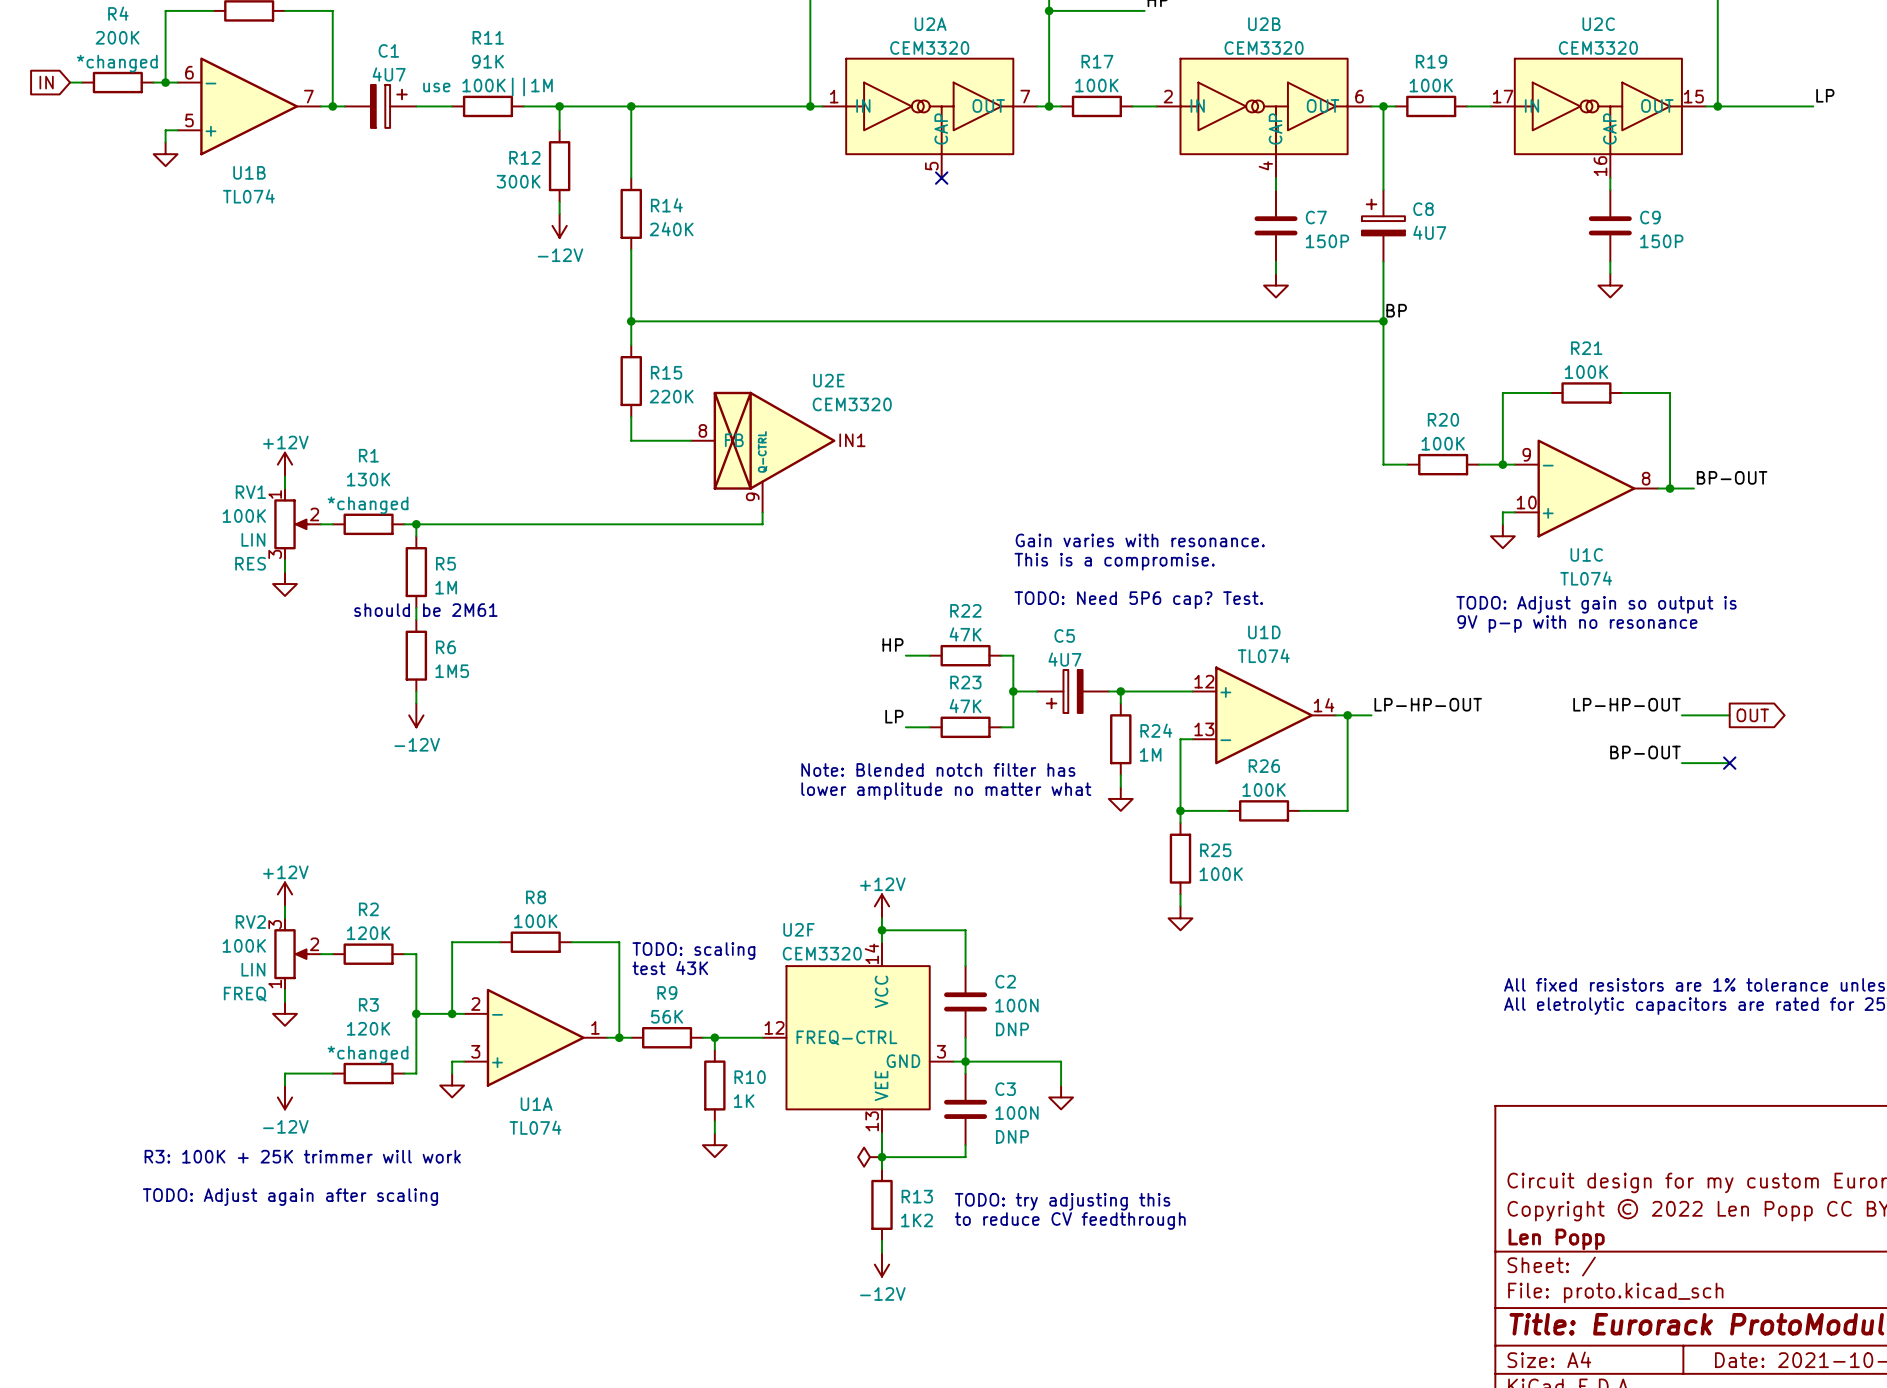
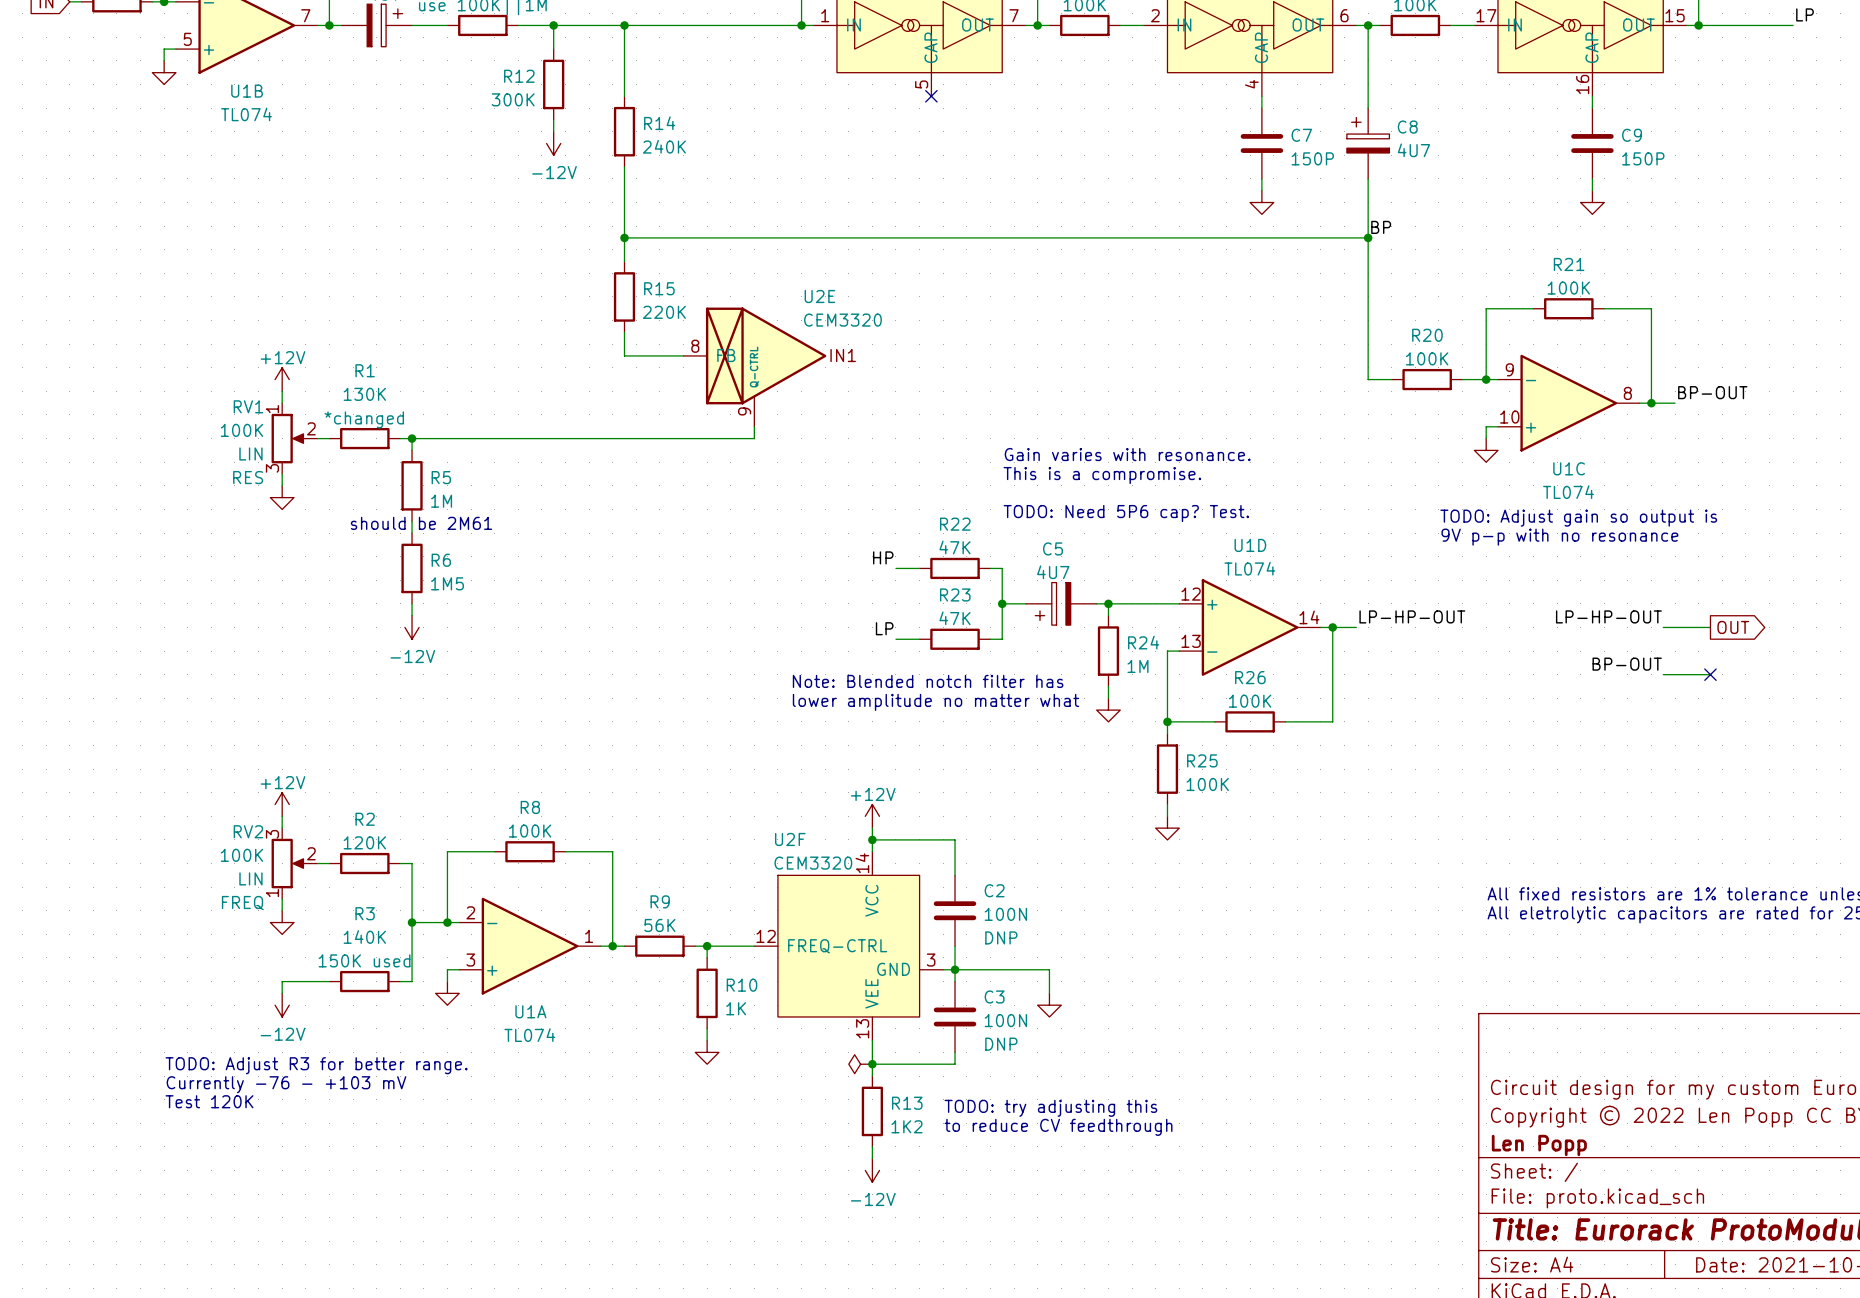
text: TODO: scaling (693, 951) -> none
text: test 43K (670, 967) -> none
R3 value: 120K (368, 1028) -> 140K (364, 937)
R3 text: *changed (368, 1054) -> 150K used (364, 960)
text: R3: 100K + 25K trimmer will work (302, 1156) -> none
text: none -> TODO: Adjust R3 for better range. (316, 1065)
text: none -> Currently -76 - +103 mV (286, 1084)
text: none -> Test 120K (209, 1101)
text: TODO: Adjust again after scaling (290, 1197) -> none

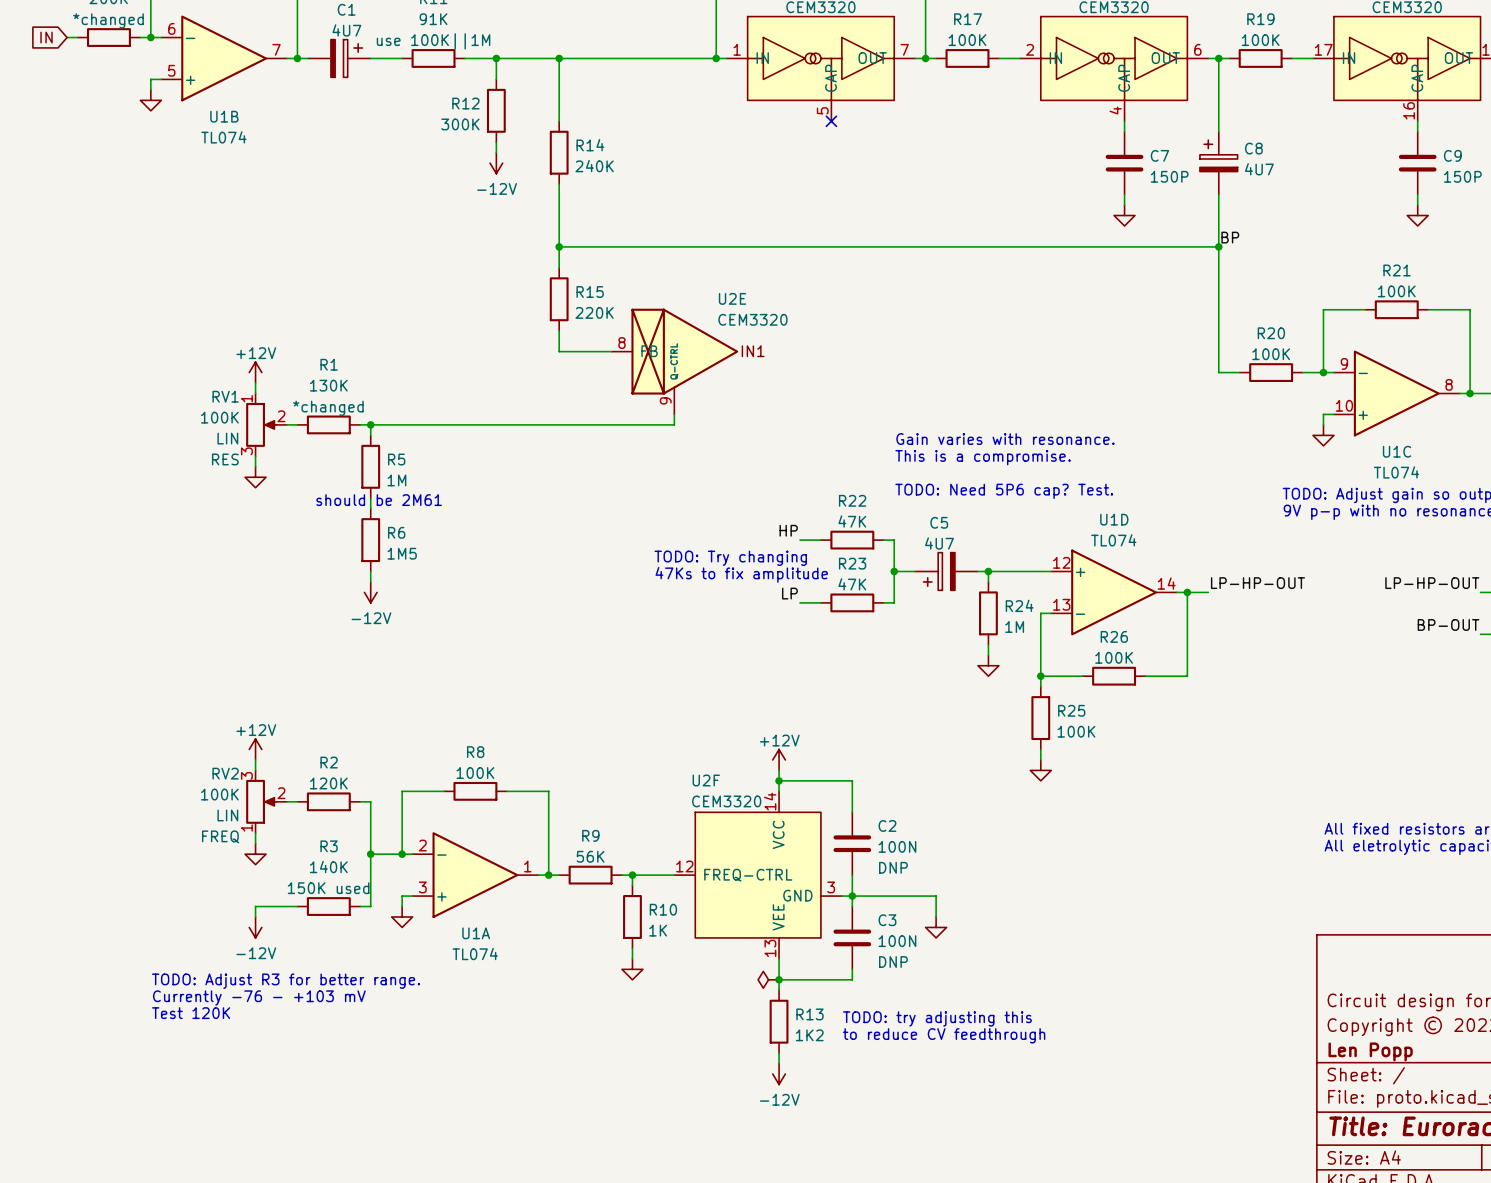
text: none -> TODO: Try changing (730, 558)
text: none -> 47Ks to fix amplitude (741, 574)
text: Note: Blended notch filter has (928, 681) -> none
text: lower amplitude no matter what (935, 702) -> none

